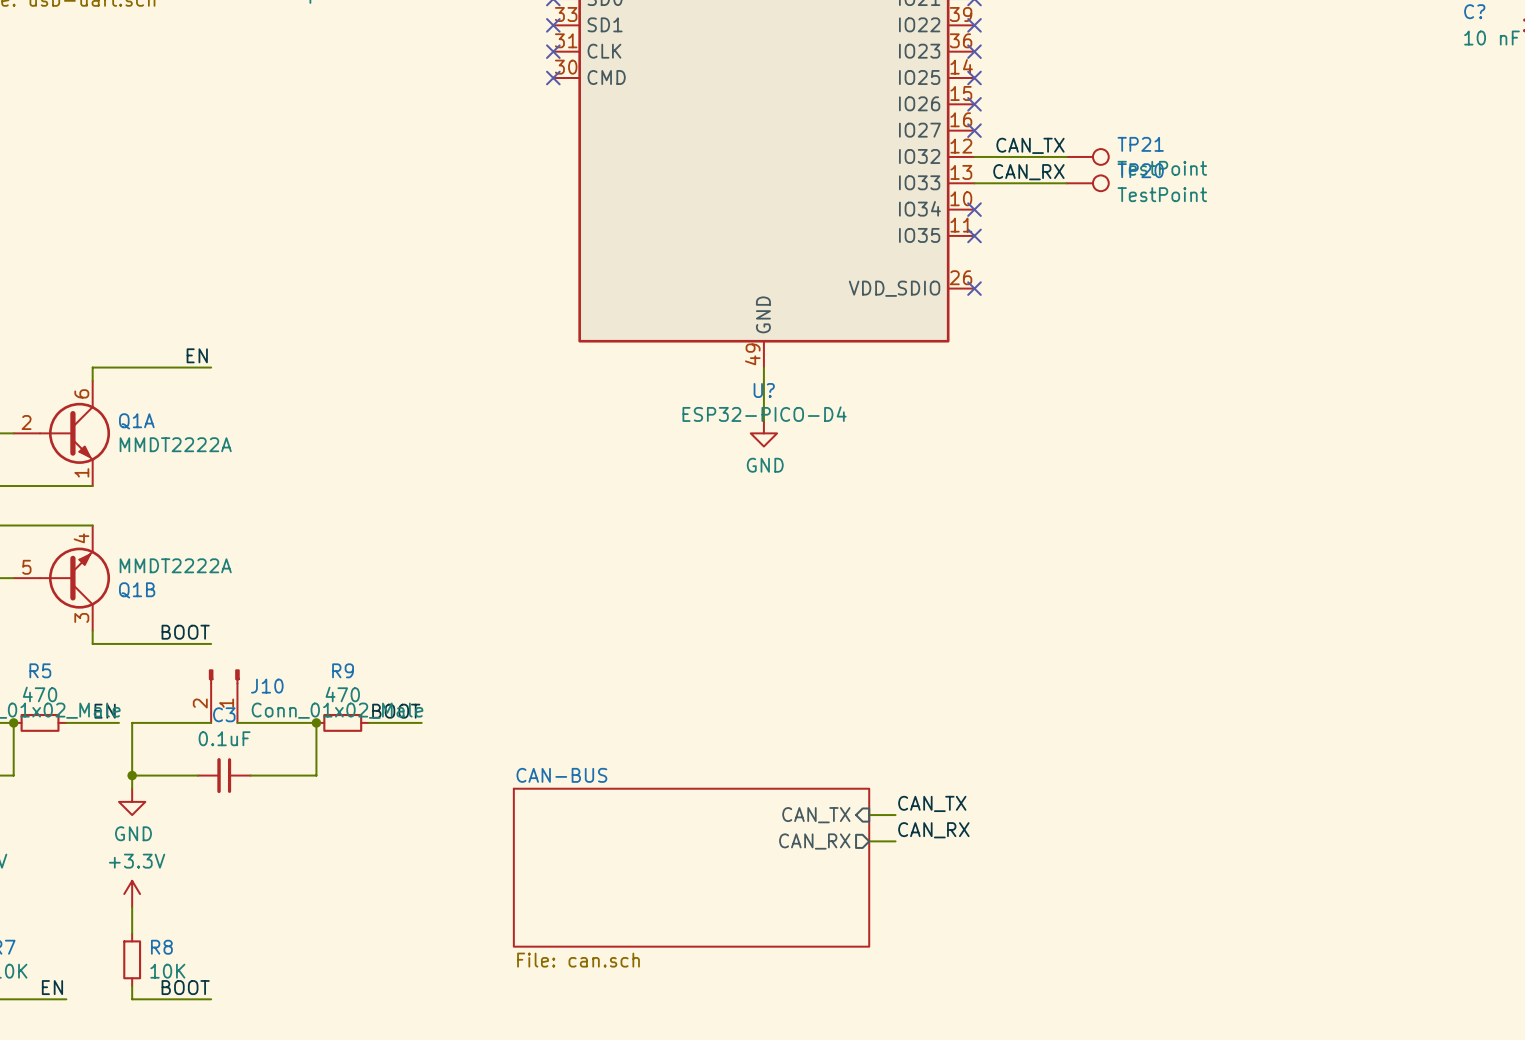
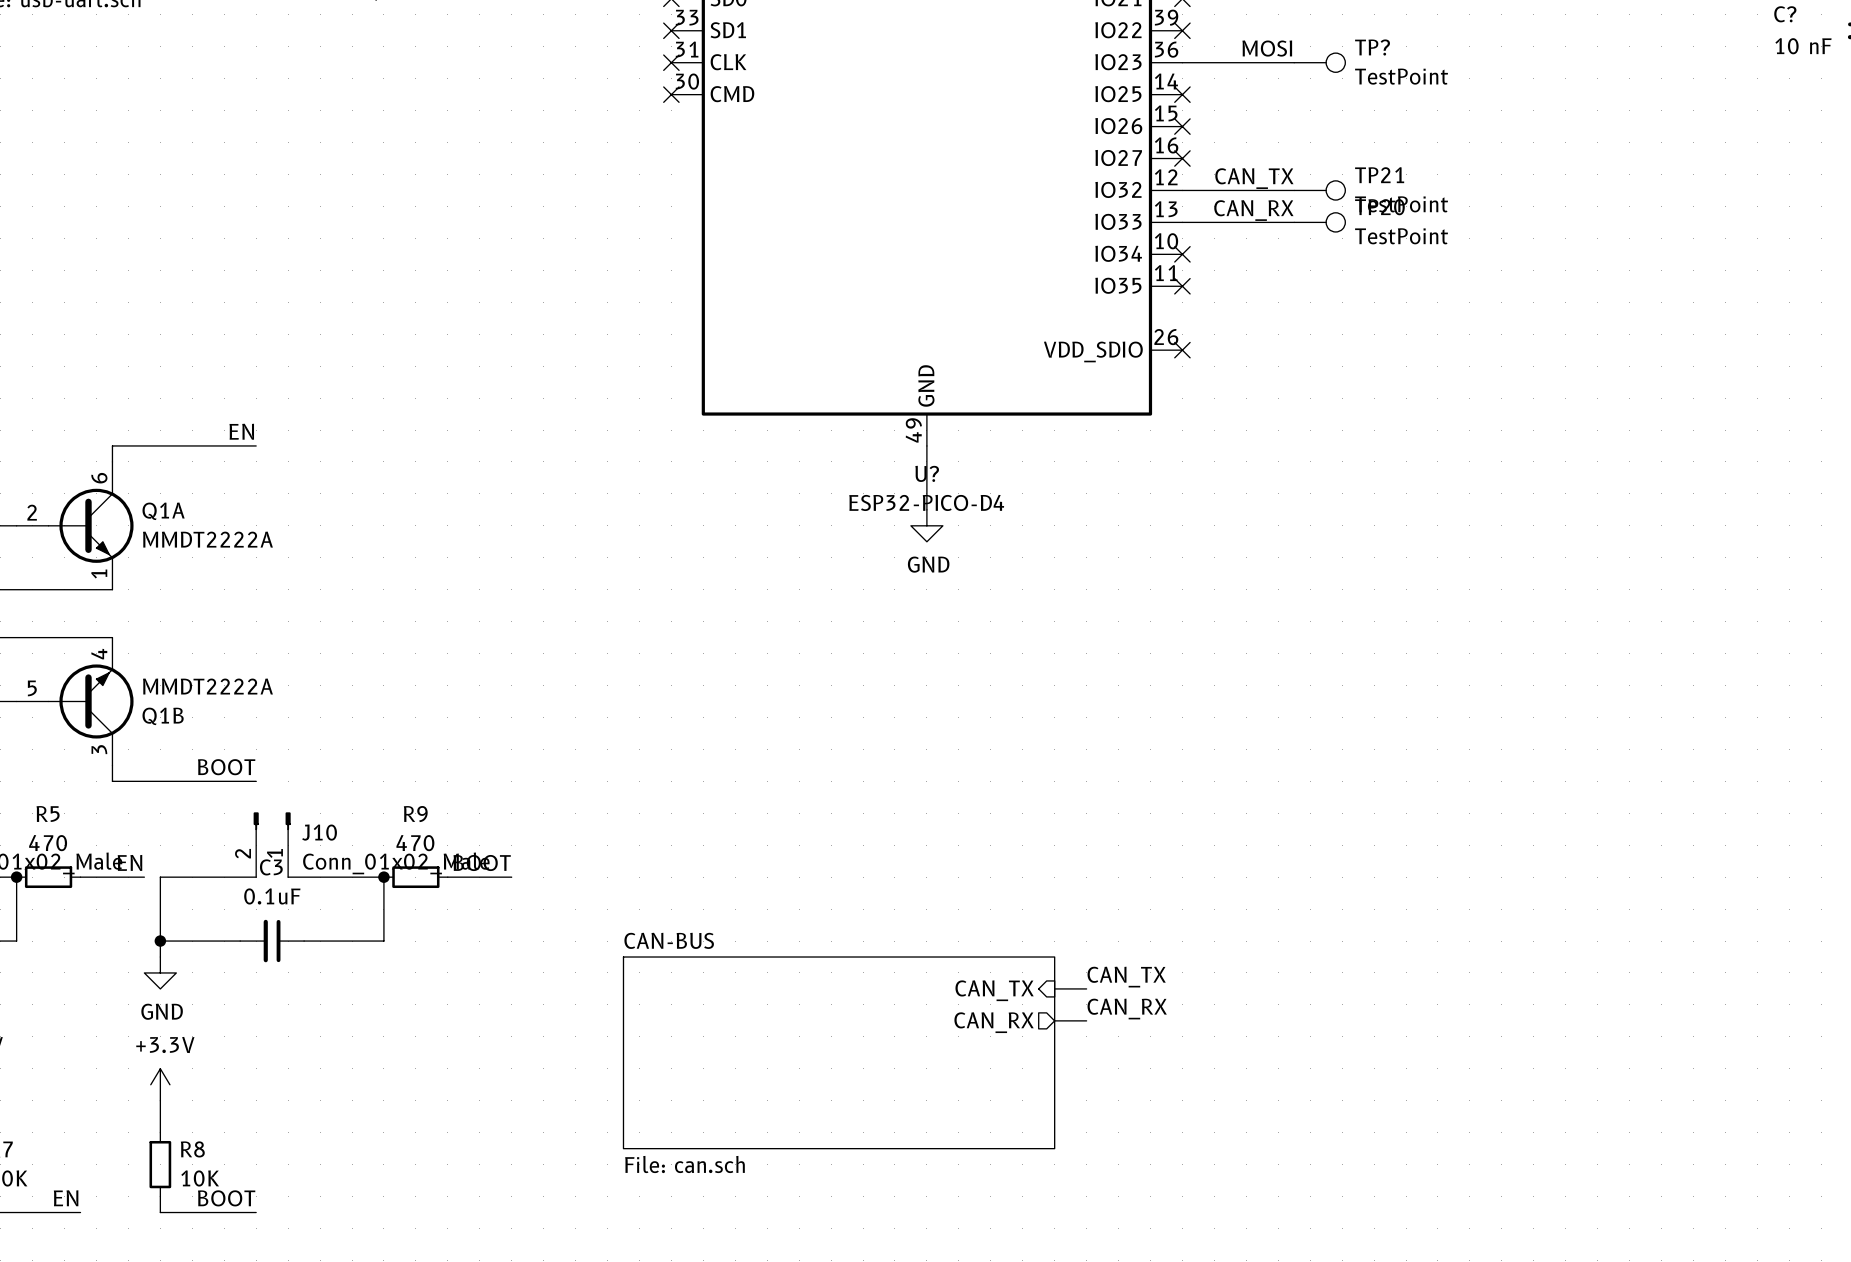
label: none -> MOSI (1267, 48)
wire: none -> (1182, 62) (1294, 62)
no-connect mark: (974, 51) -> none
TP?: none -> TestPoint (1319, 62)

